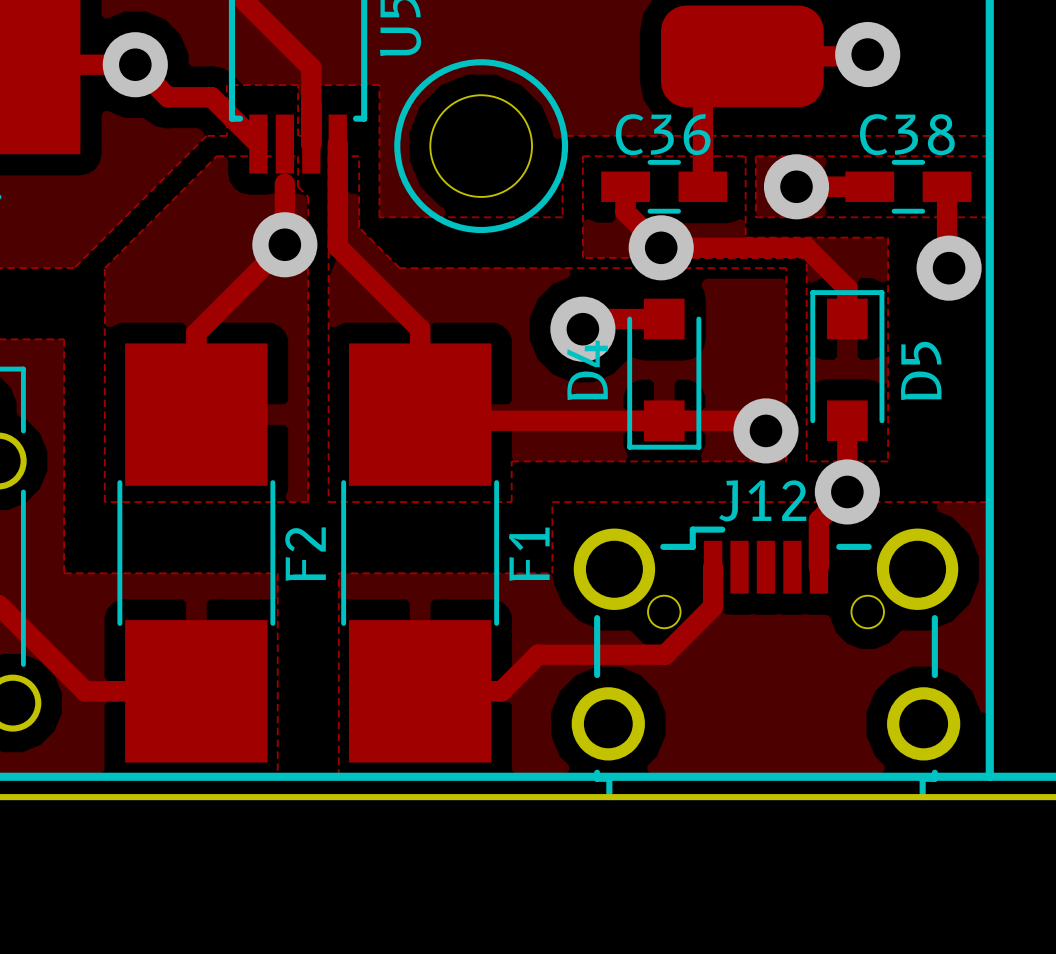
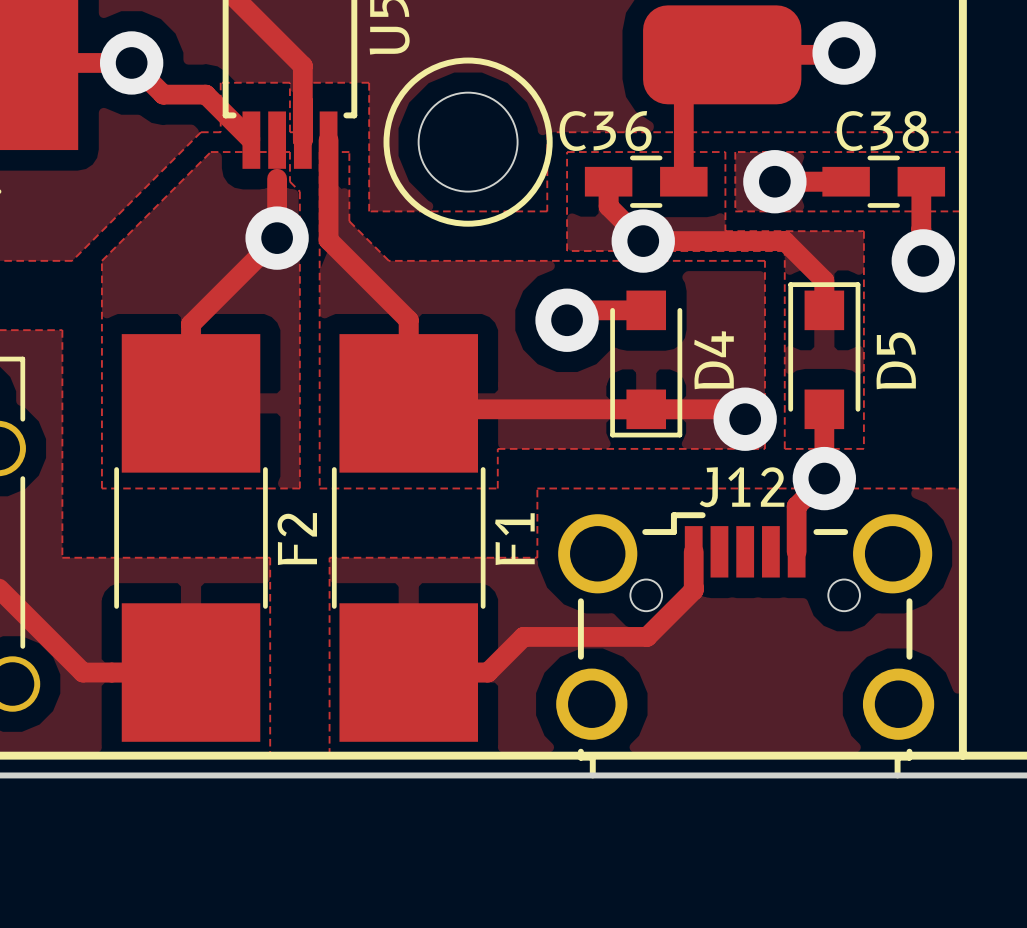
C36 name position: C36 (663, 134) -> C36 (605, 131)
D4 name position: D4 (587, 370) -> D4 (714, 360)

